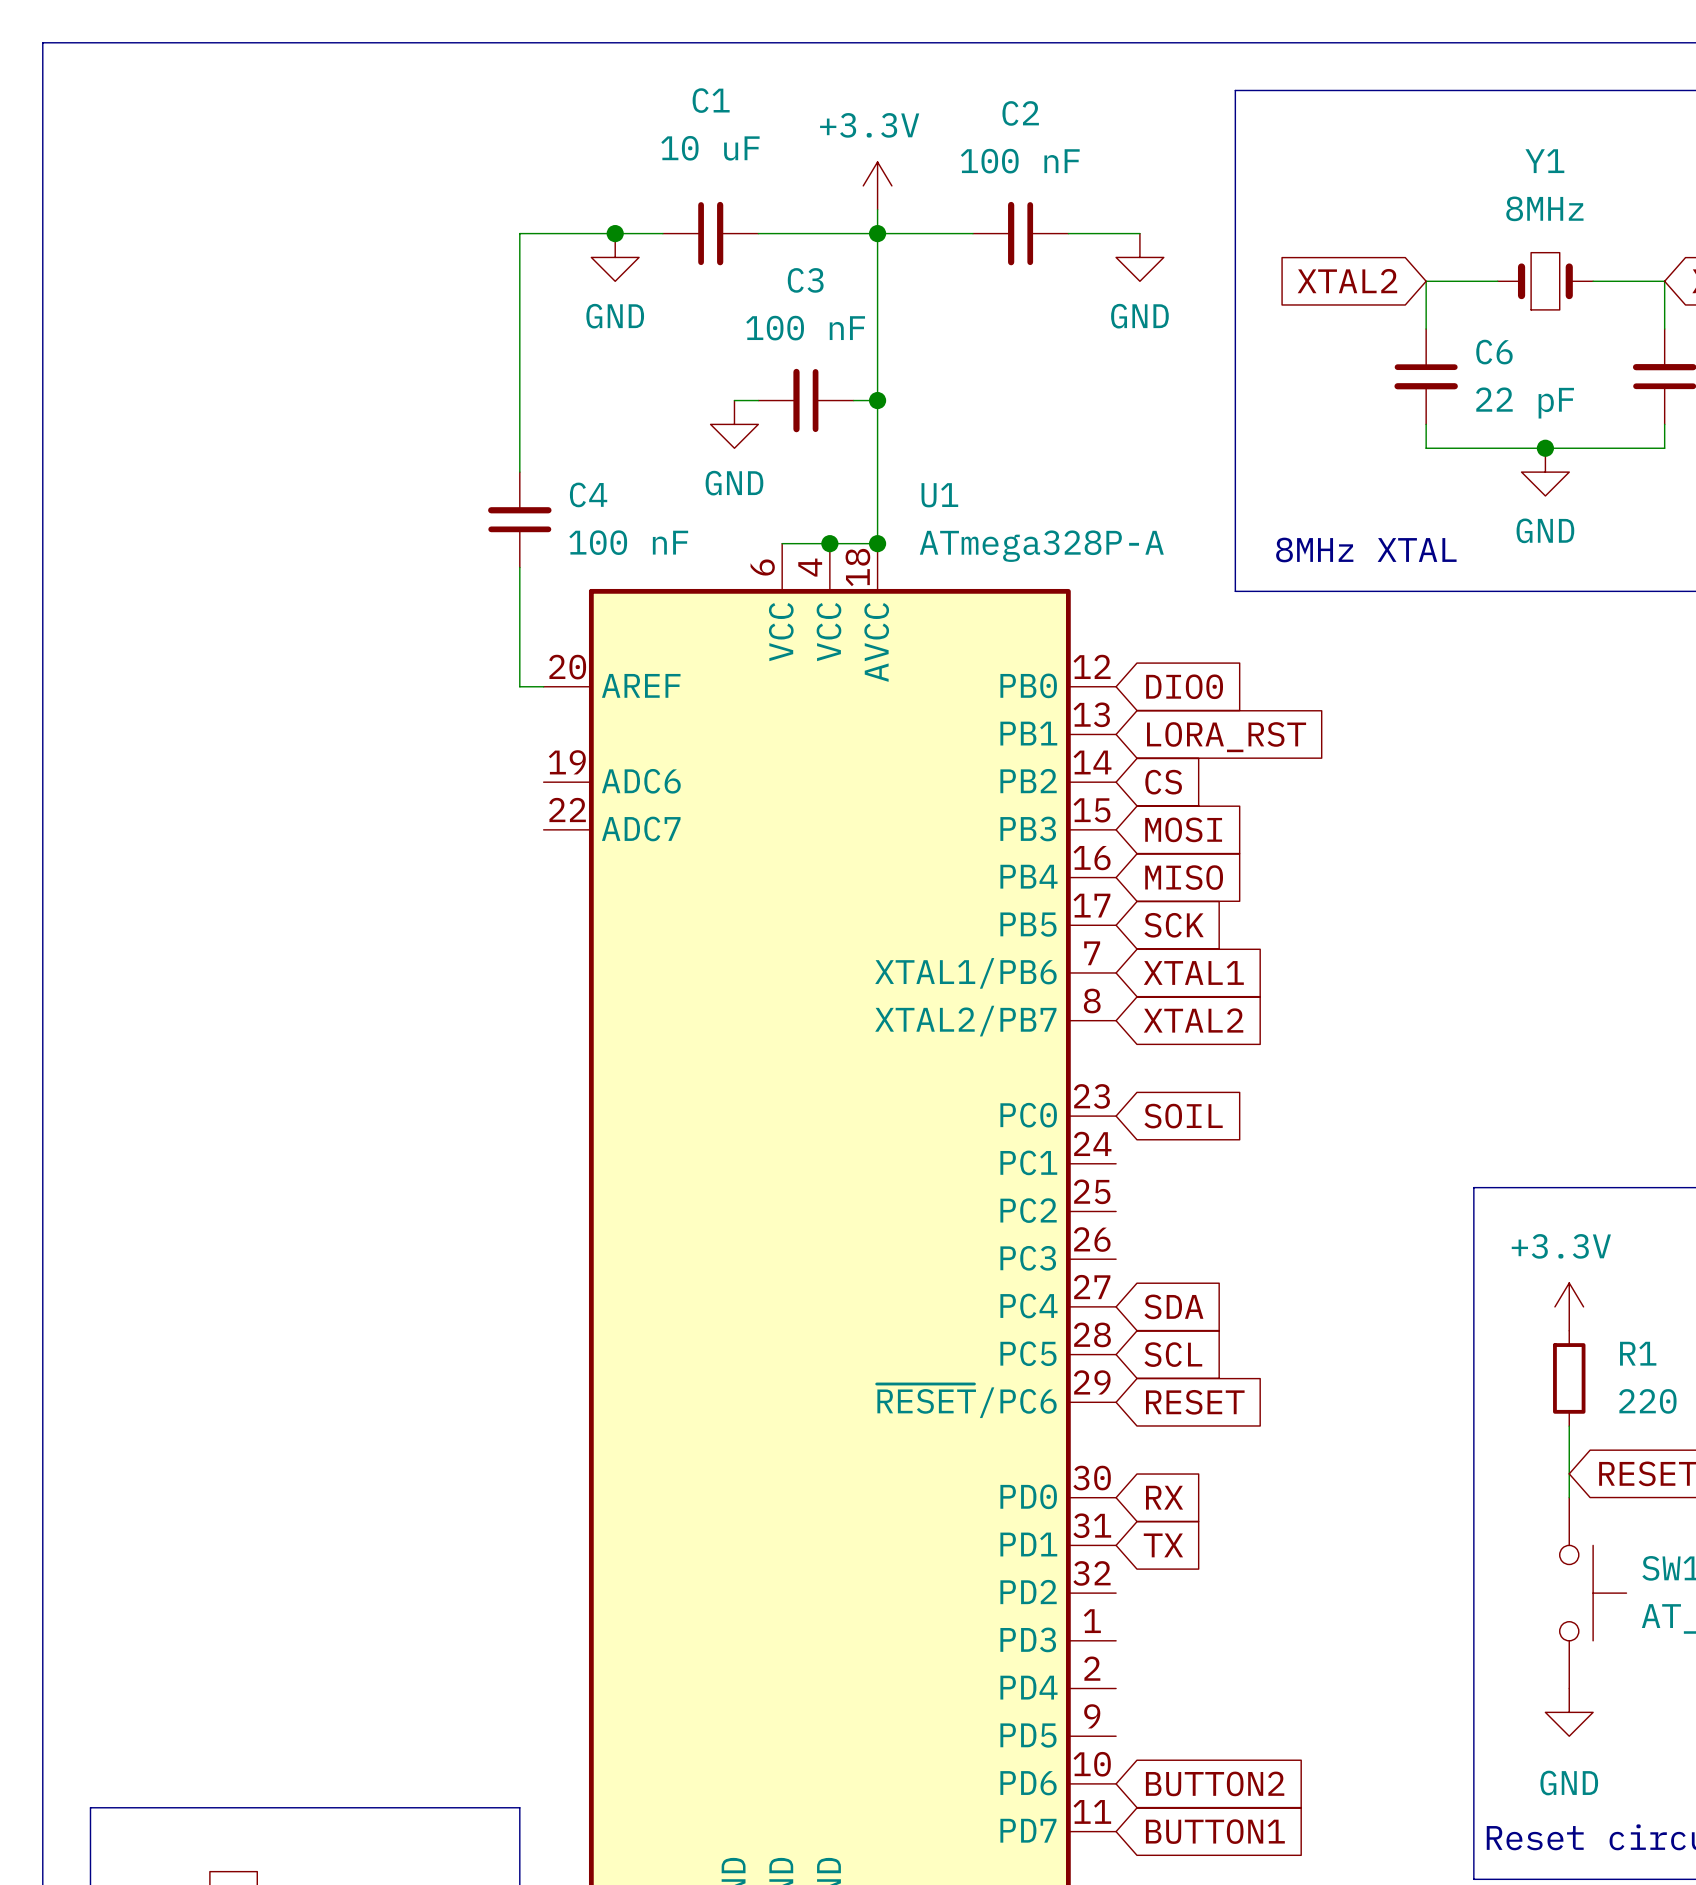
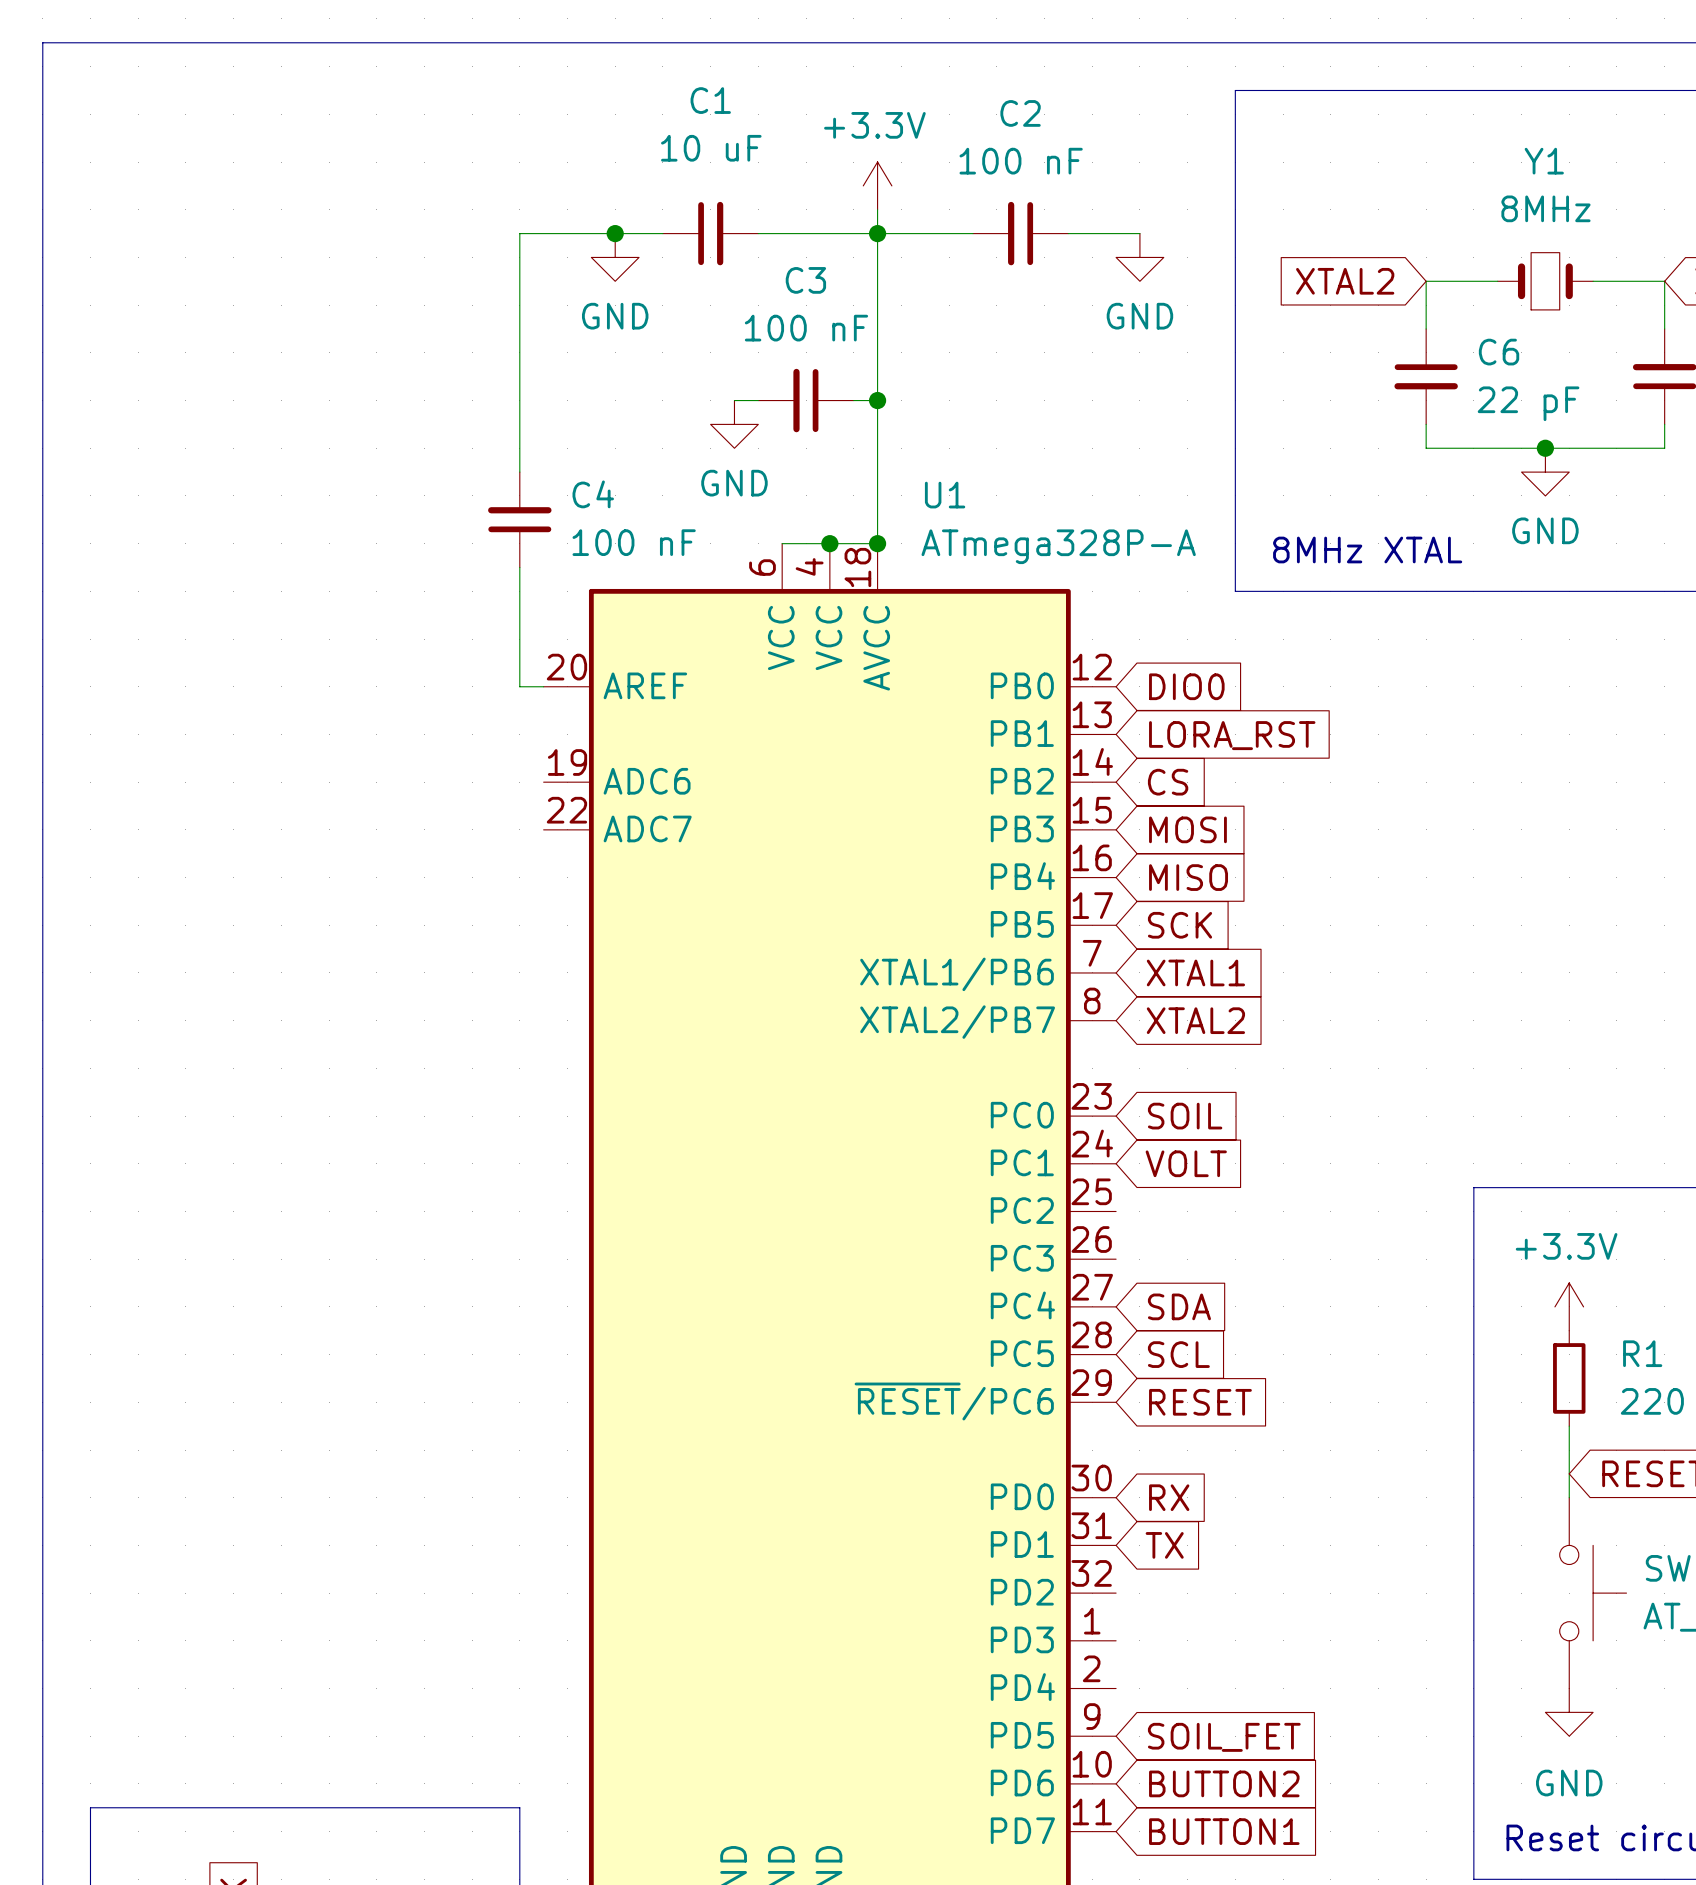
global label: none -> VOLT (1186, 1163)
global label: none -> SOIL_FET (1224, 1737)

